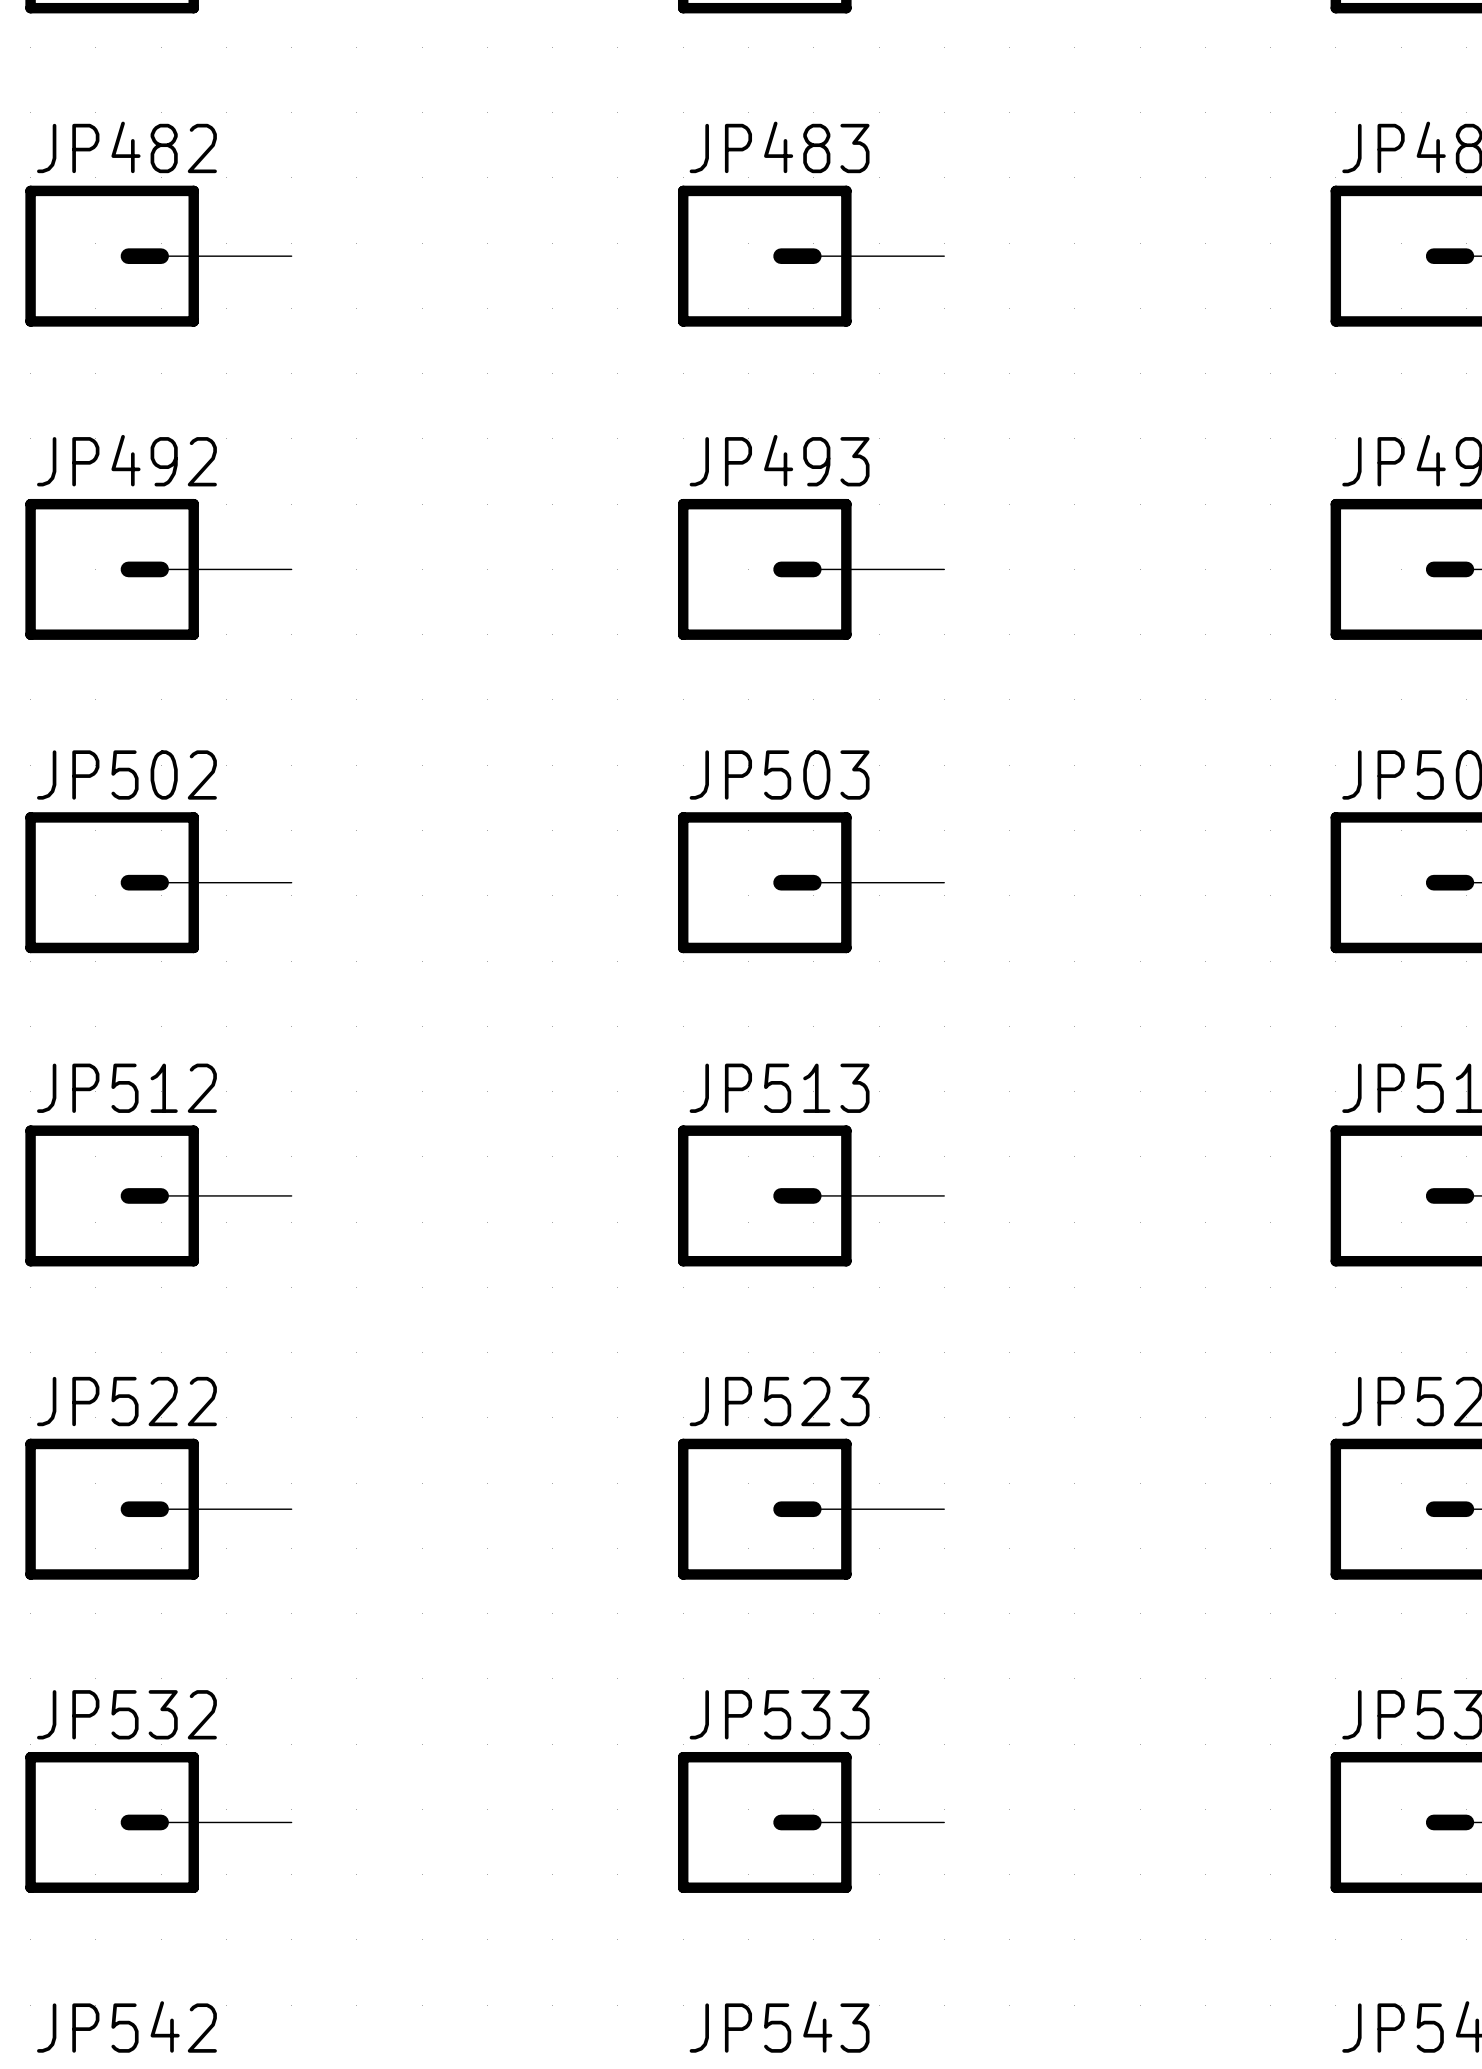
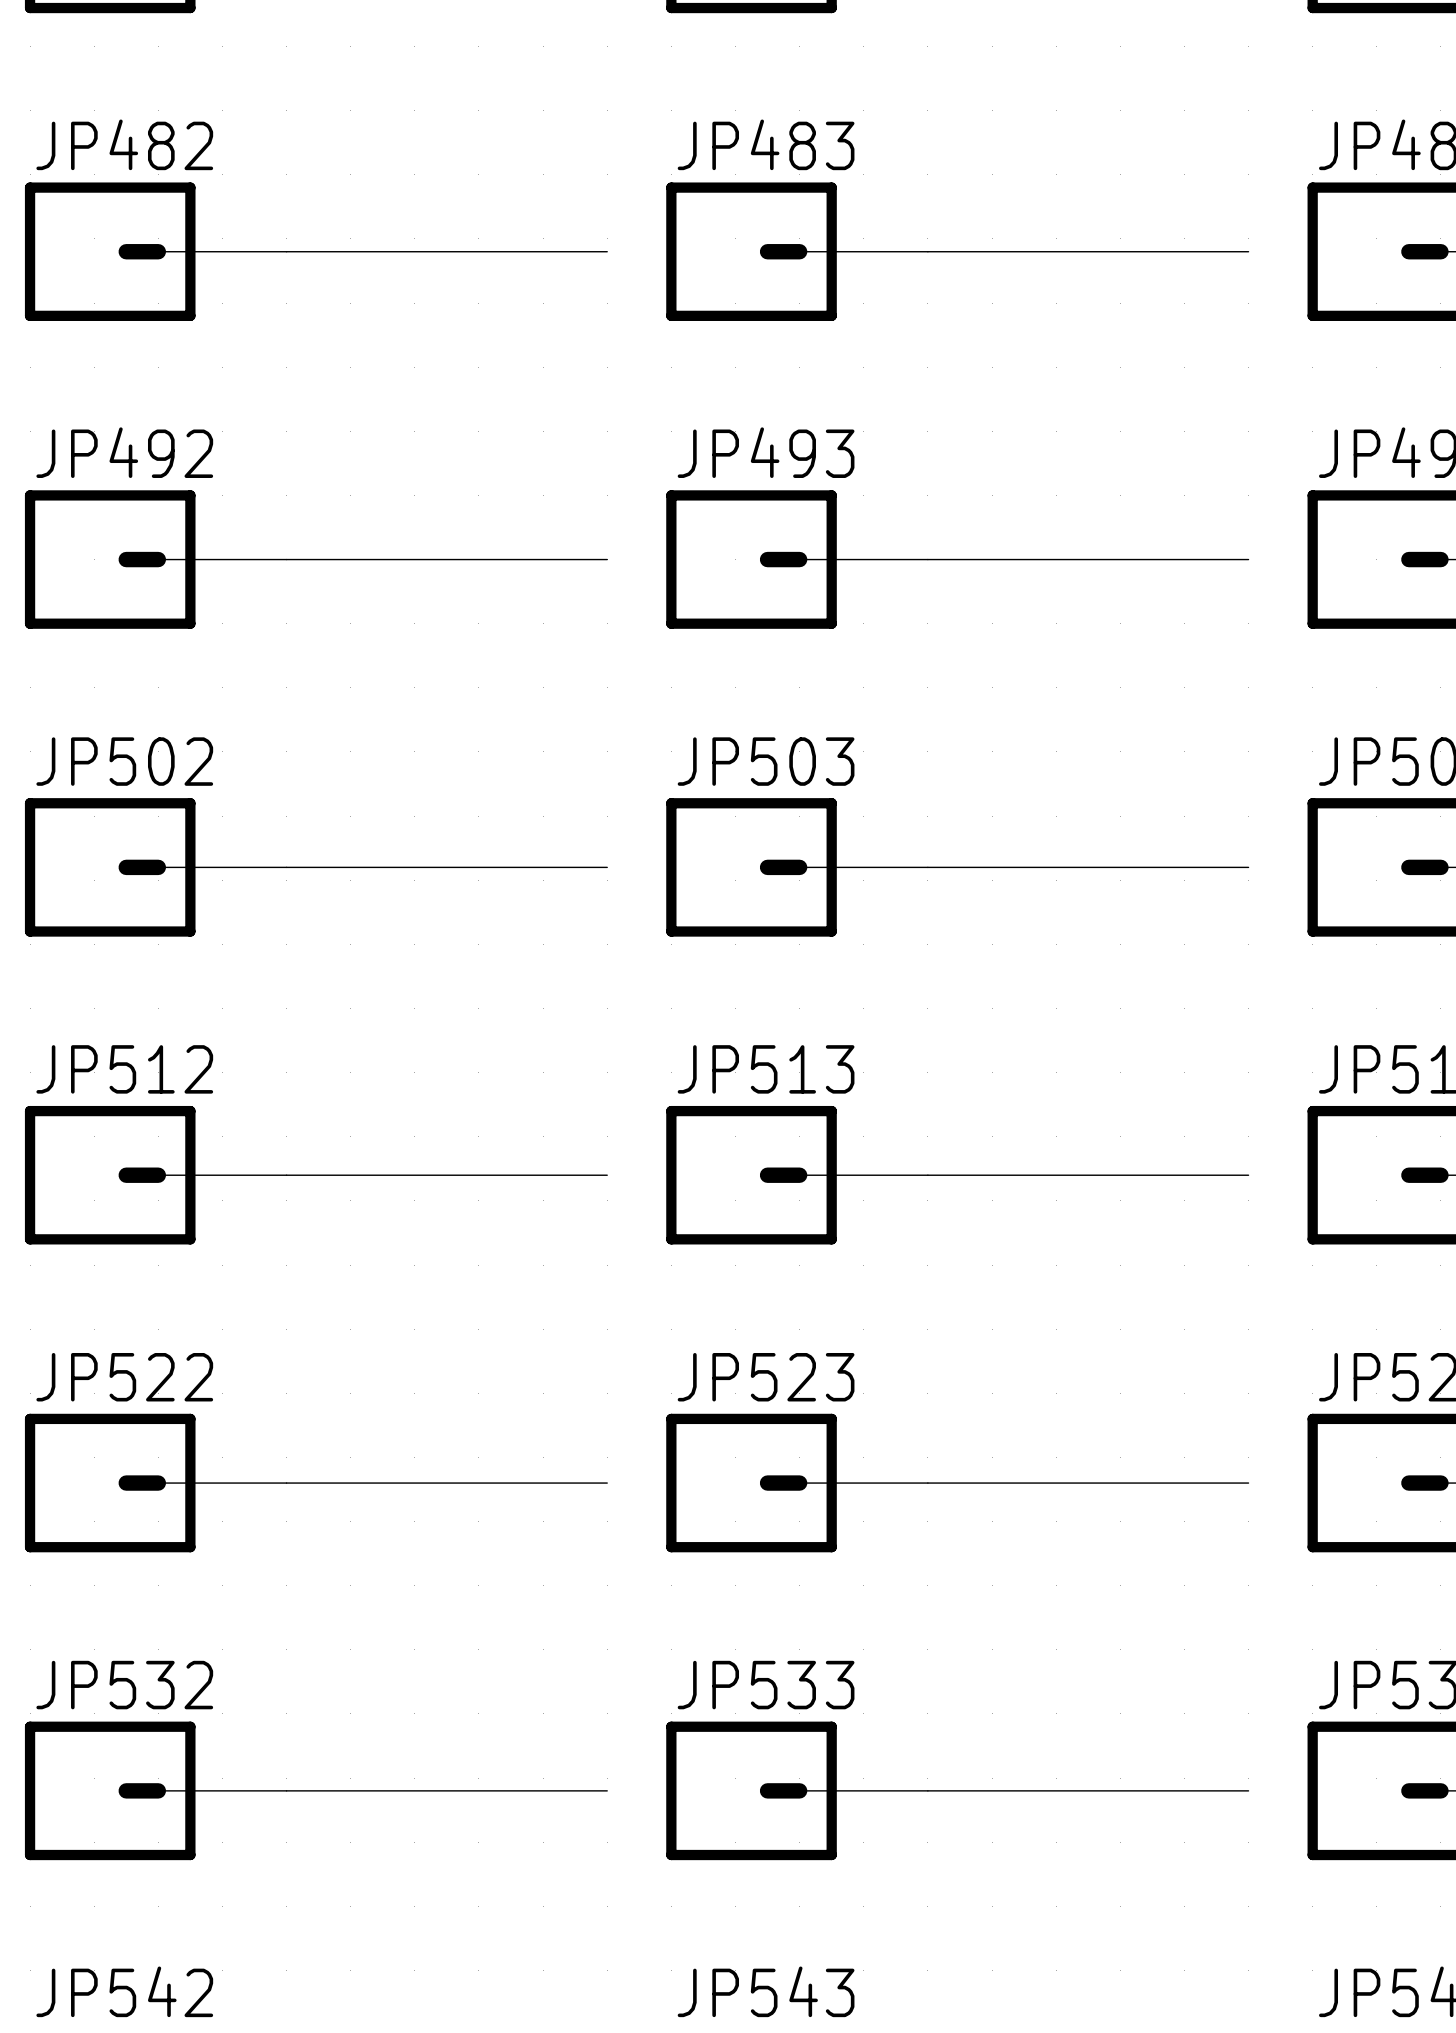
wire: none -> (286, 251) (607, 251)
wire: none -> (927, 251) (1248, 251)
wire: none -> (286, 559) (607, 559)
wire: none -> (927, 559) (1248, 559)
wire: none -> (286, 867) (607, 867)
wire: none -> (927, 867) (1248, 867)
wire: none -> (286, 1175) (607, 1175)
wire: none -> (927, 1175) (1248, 1175)
wire: none -> (286, 1483) (607, 1483)
wire: none -> (927, 1483) (1248, 1483)
wire: none -> (286, 1790) (607, 1790)
wire: none -> (927, 1790) (1248, 1790)

